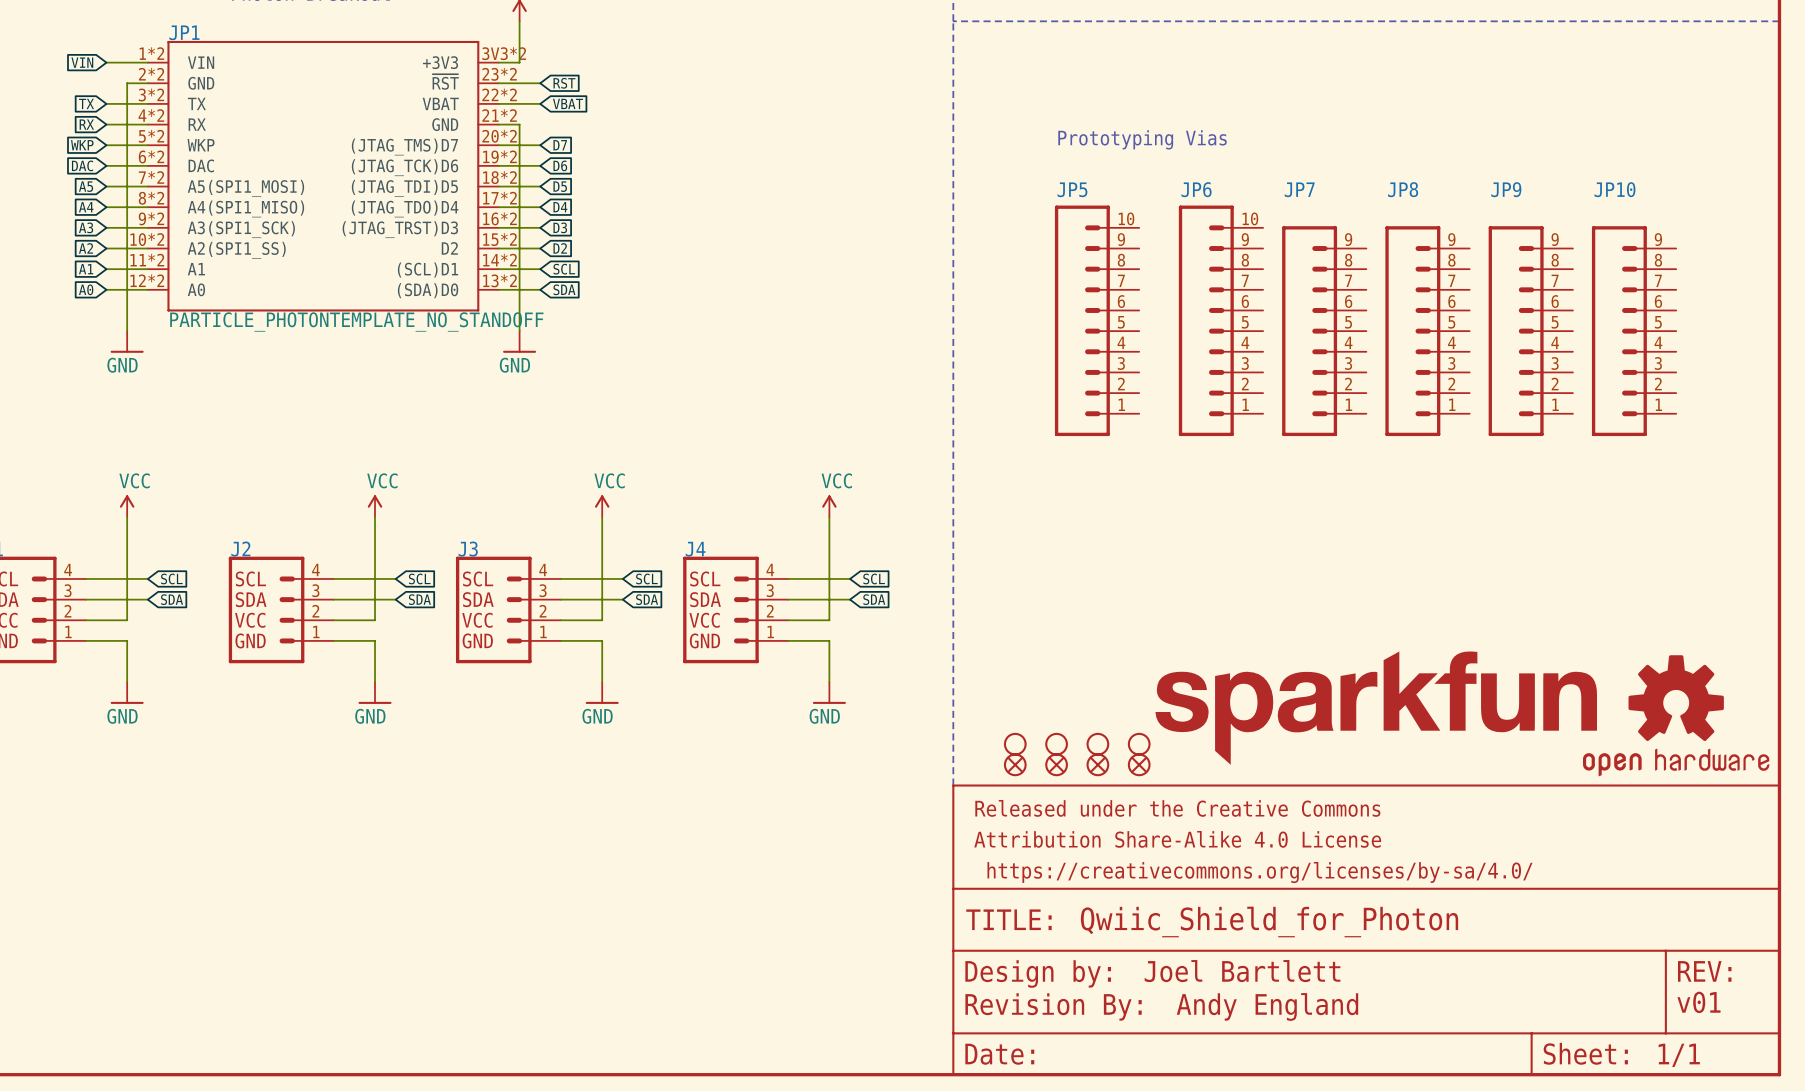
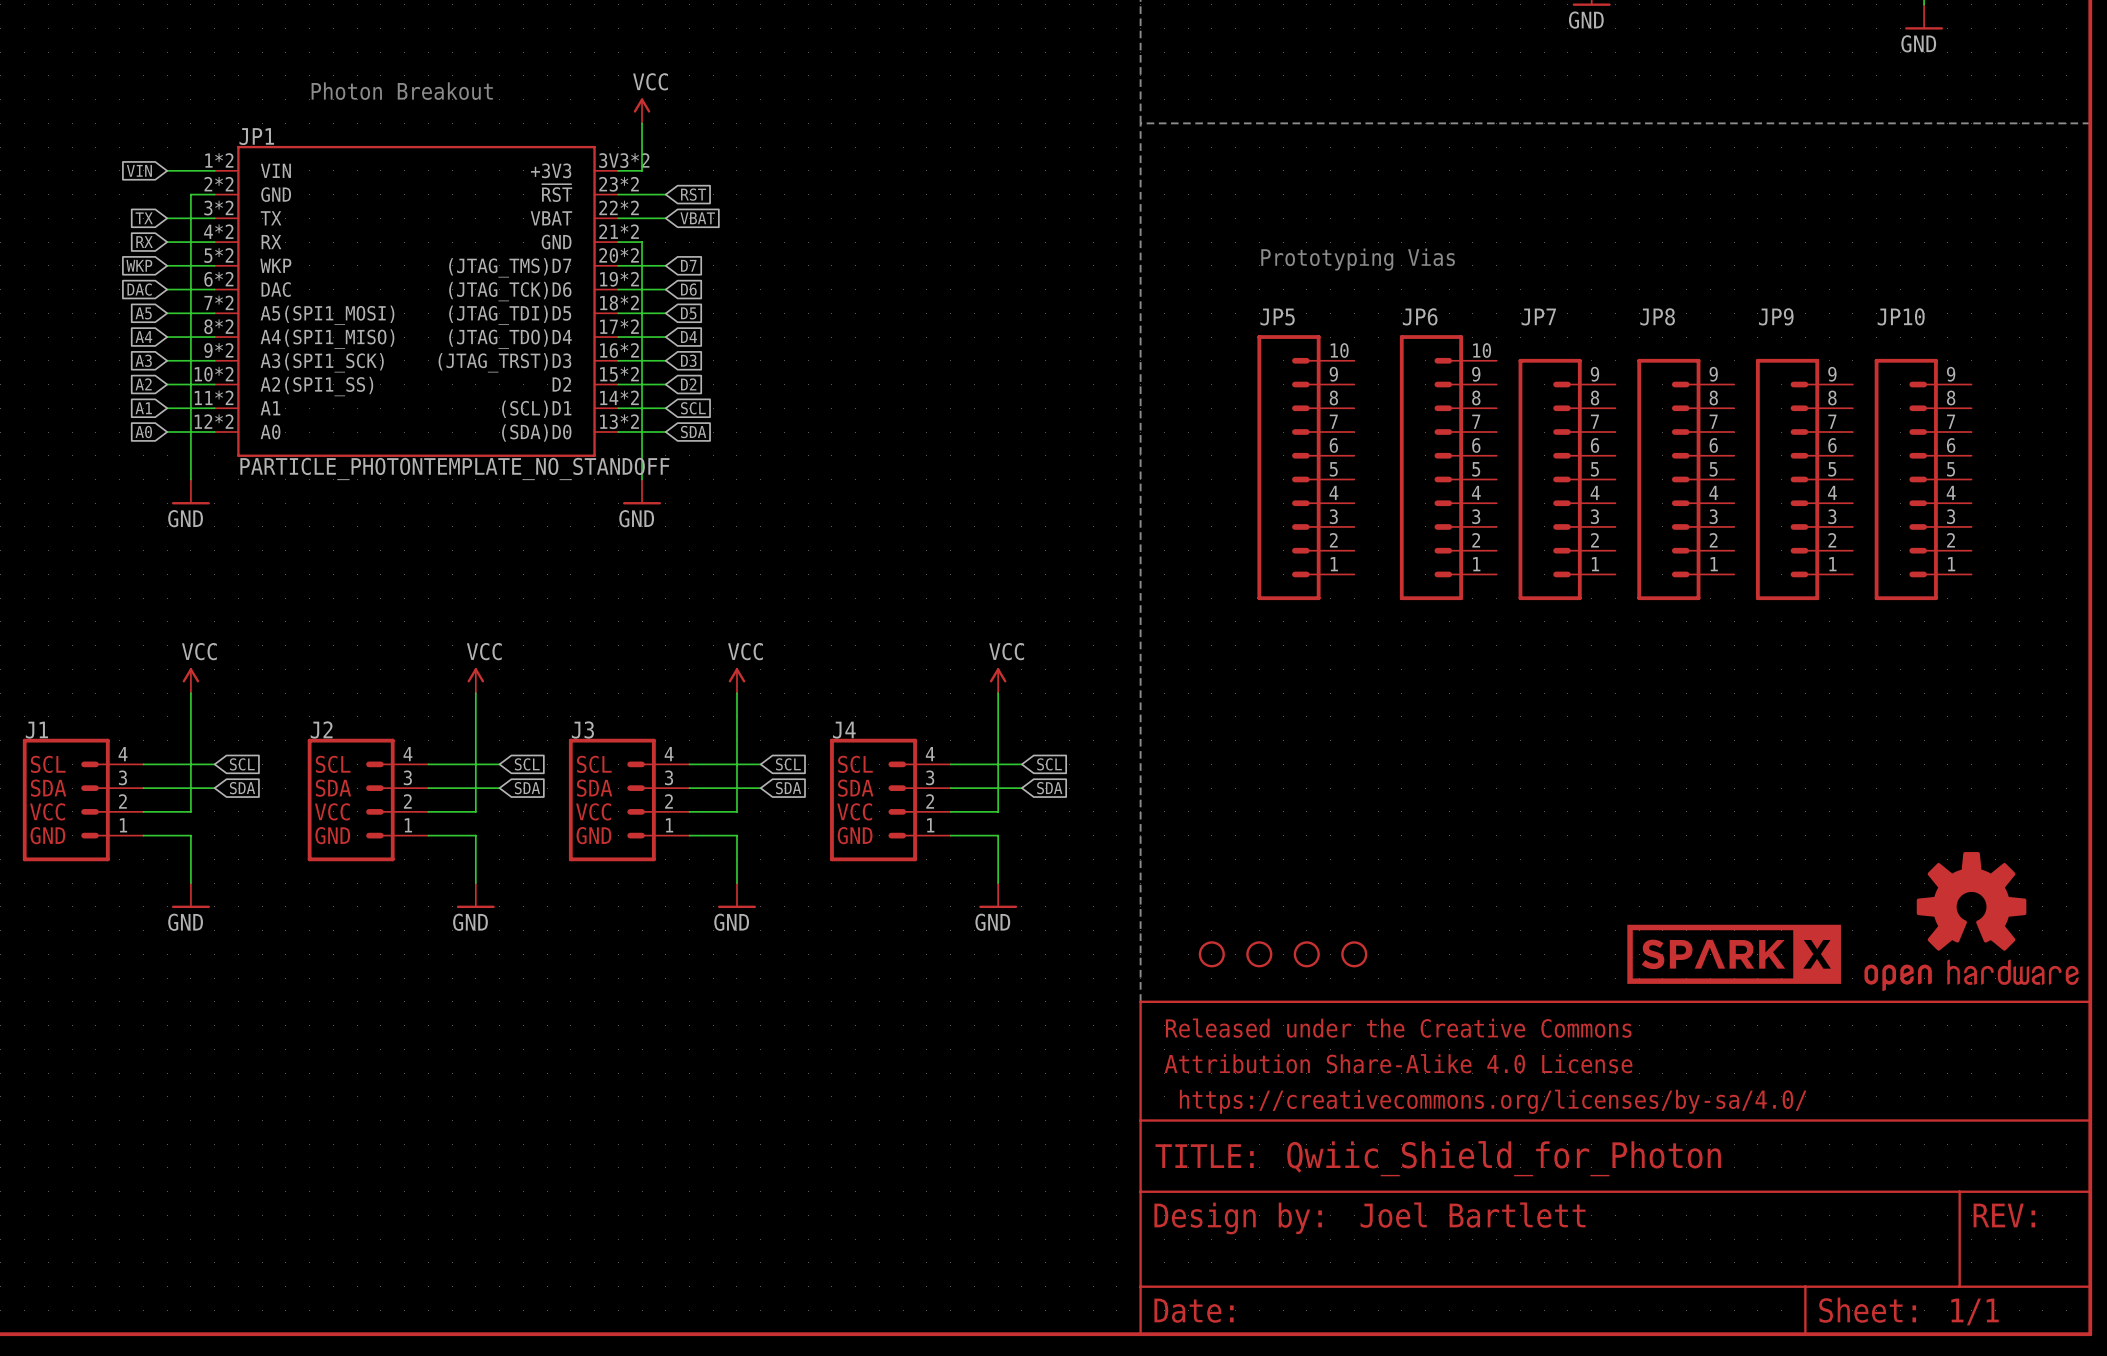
part: (1376, 708) -> none
part: none -> (1734, 954)
part: (1015, 764) -> none
part: (1056, 764) -> none
part: (1097, 764) -> none
part: (1139, 764) -> none
text: v01 (1698, 1002) -> none
part: (1053, 1006) -> none
text: Andy England (1267, 1006) -> none

